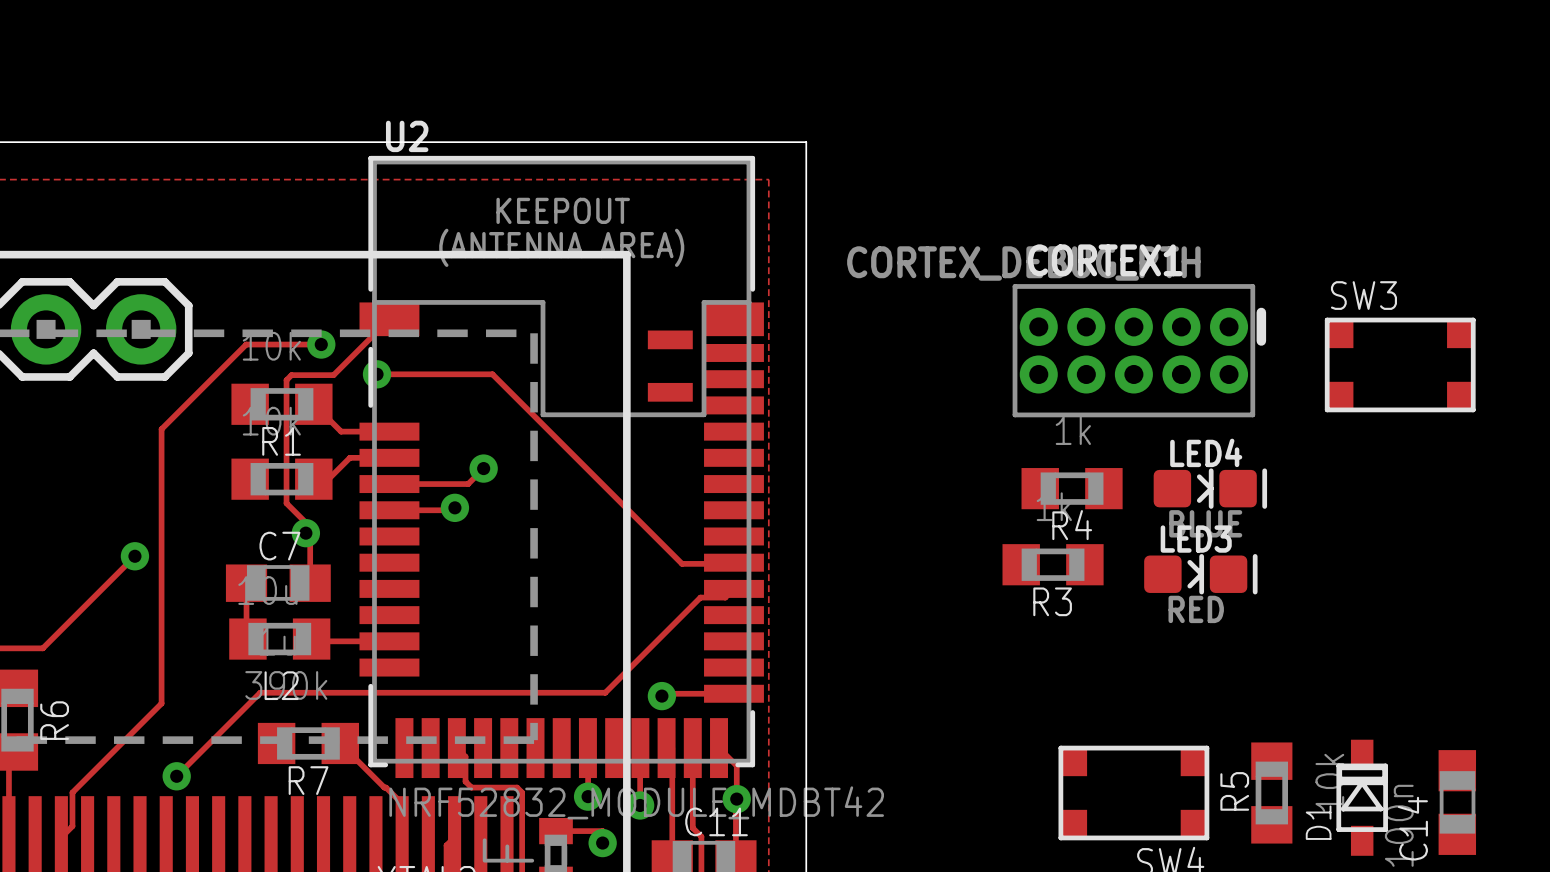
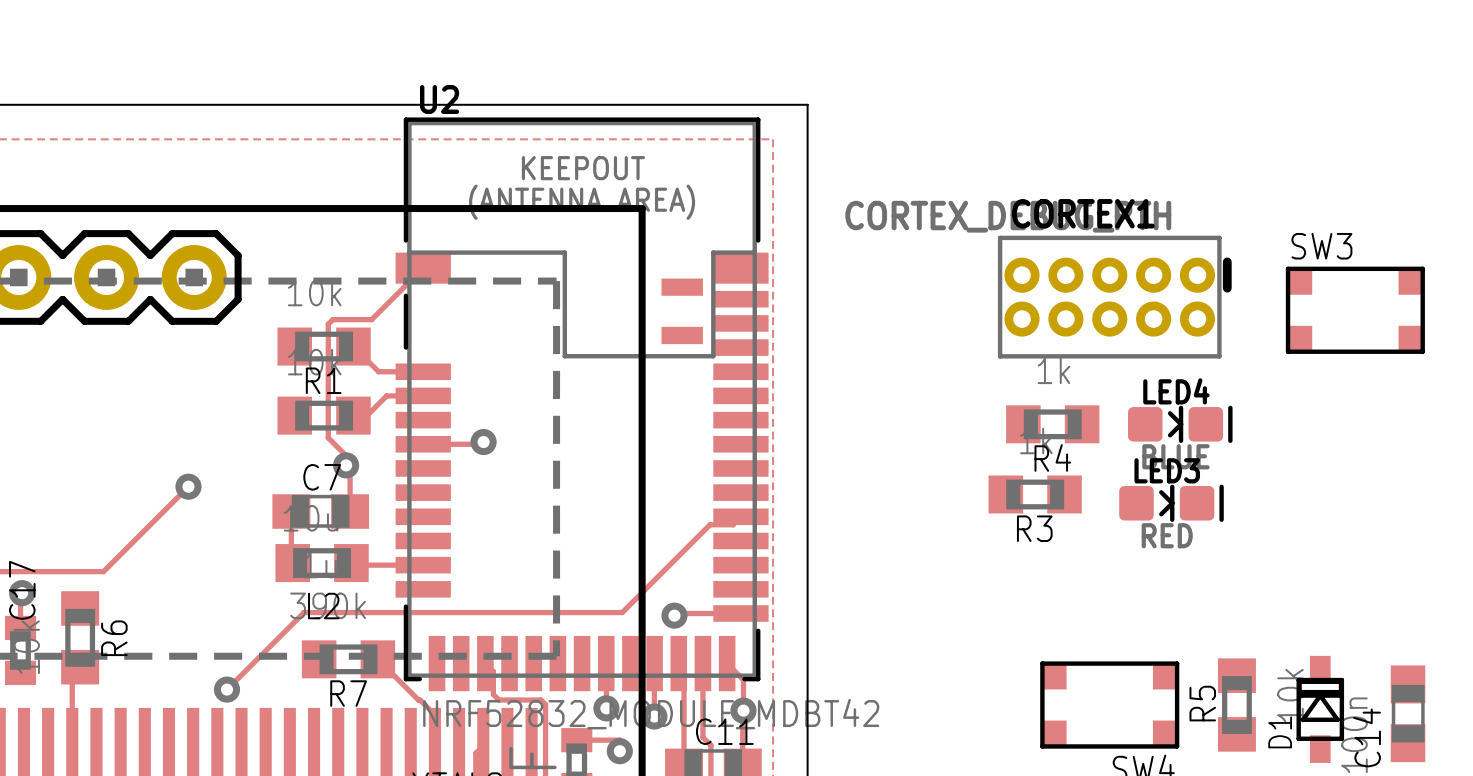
track: (321, 344) (246, 344) (161, 429) (161, 703) (72, 792) (72, 826) (61, 837) -> none
via: (321, 344) -> none
track: (377, 374) (492, 374) (682, 563) (733, 562) -> none
via: (377, 374) -> none
track: (483, 468) (468, 484) (389, 484) -> none
via: (483, 468) -> none

